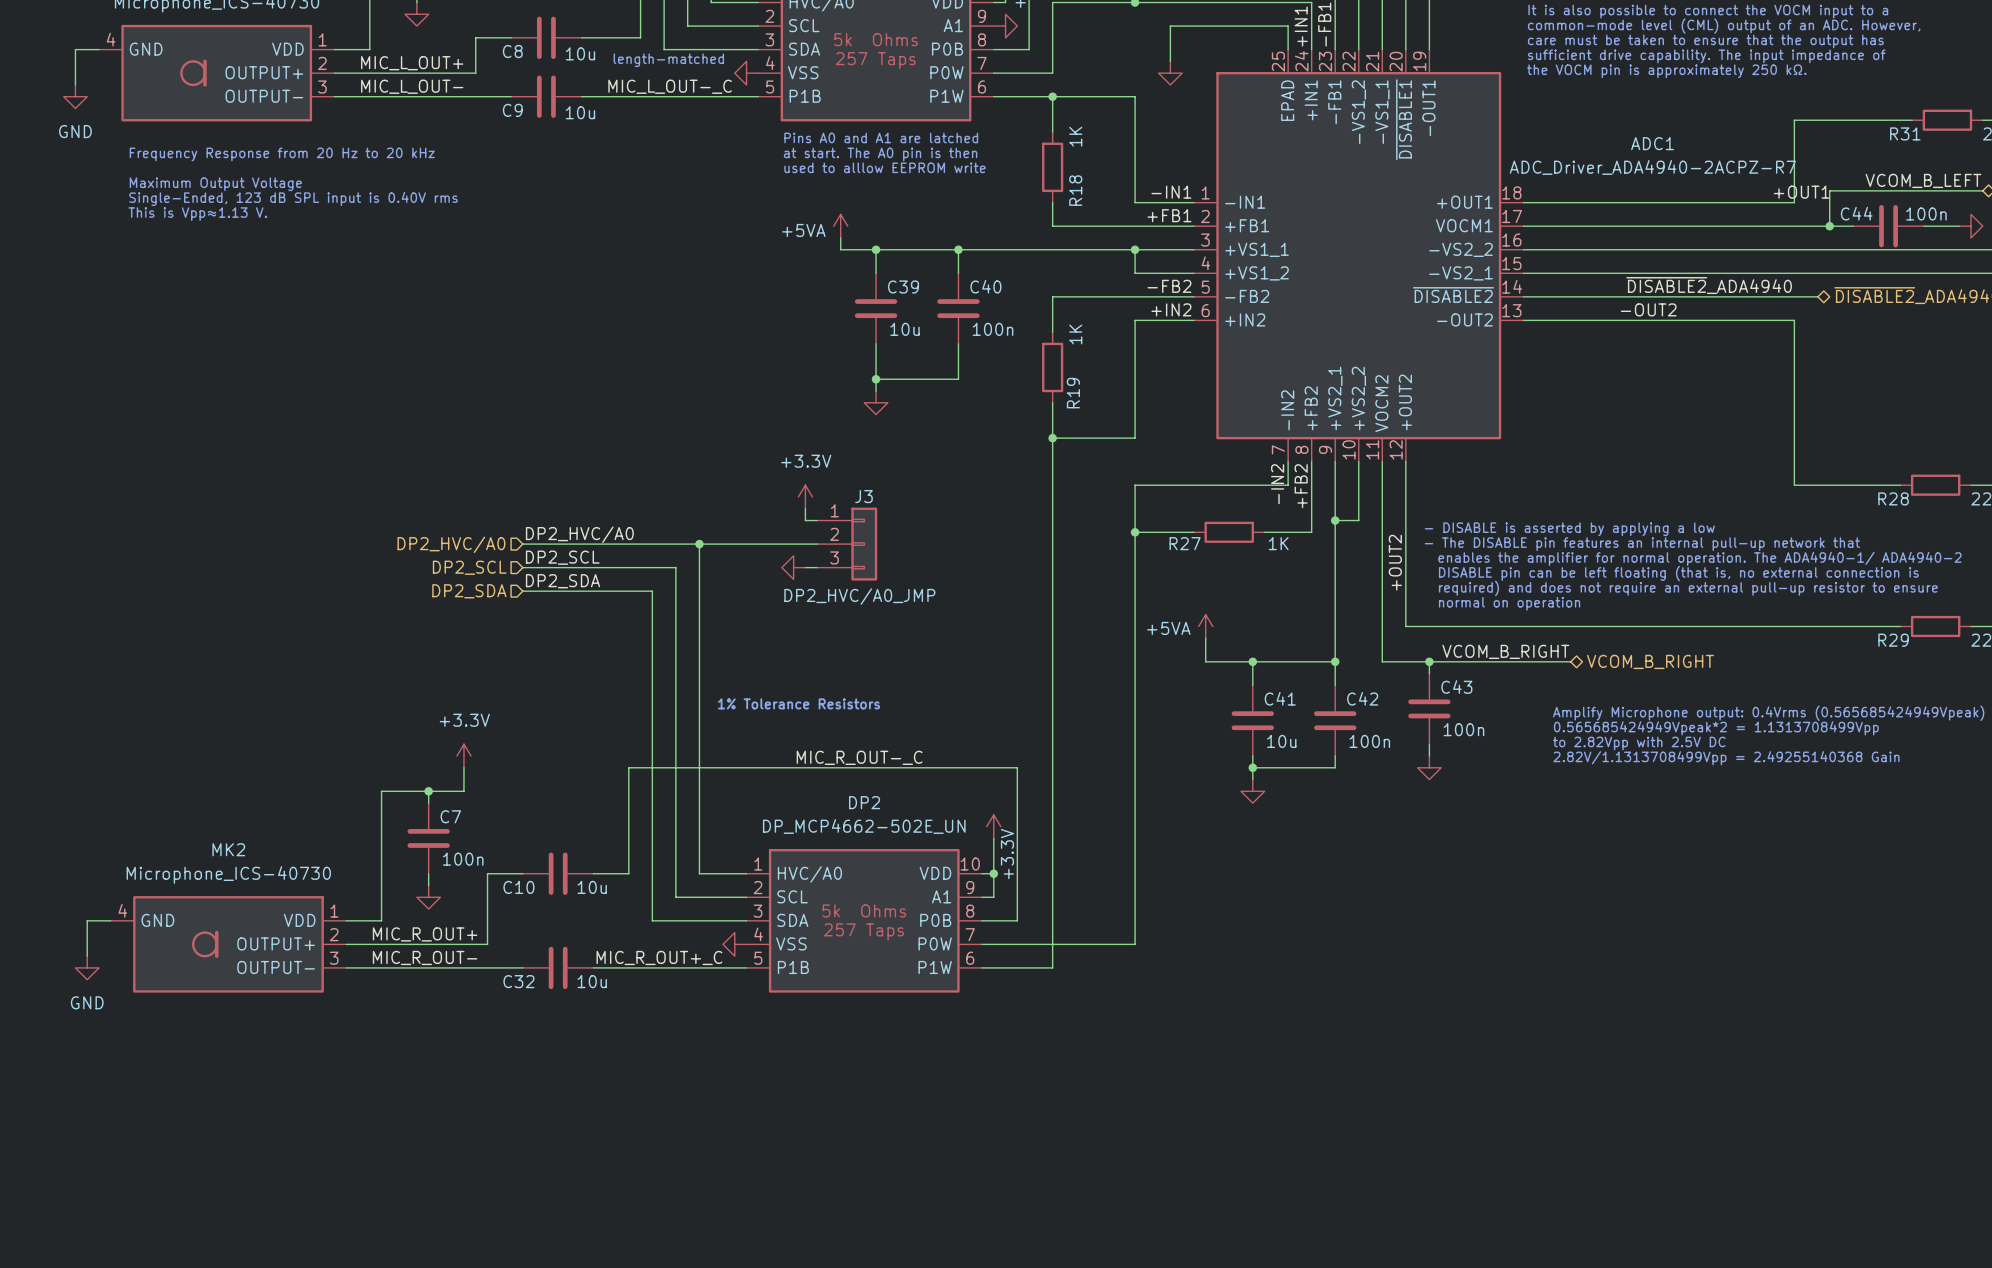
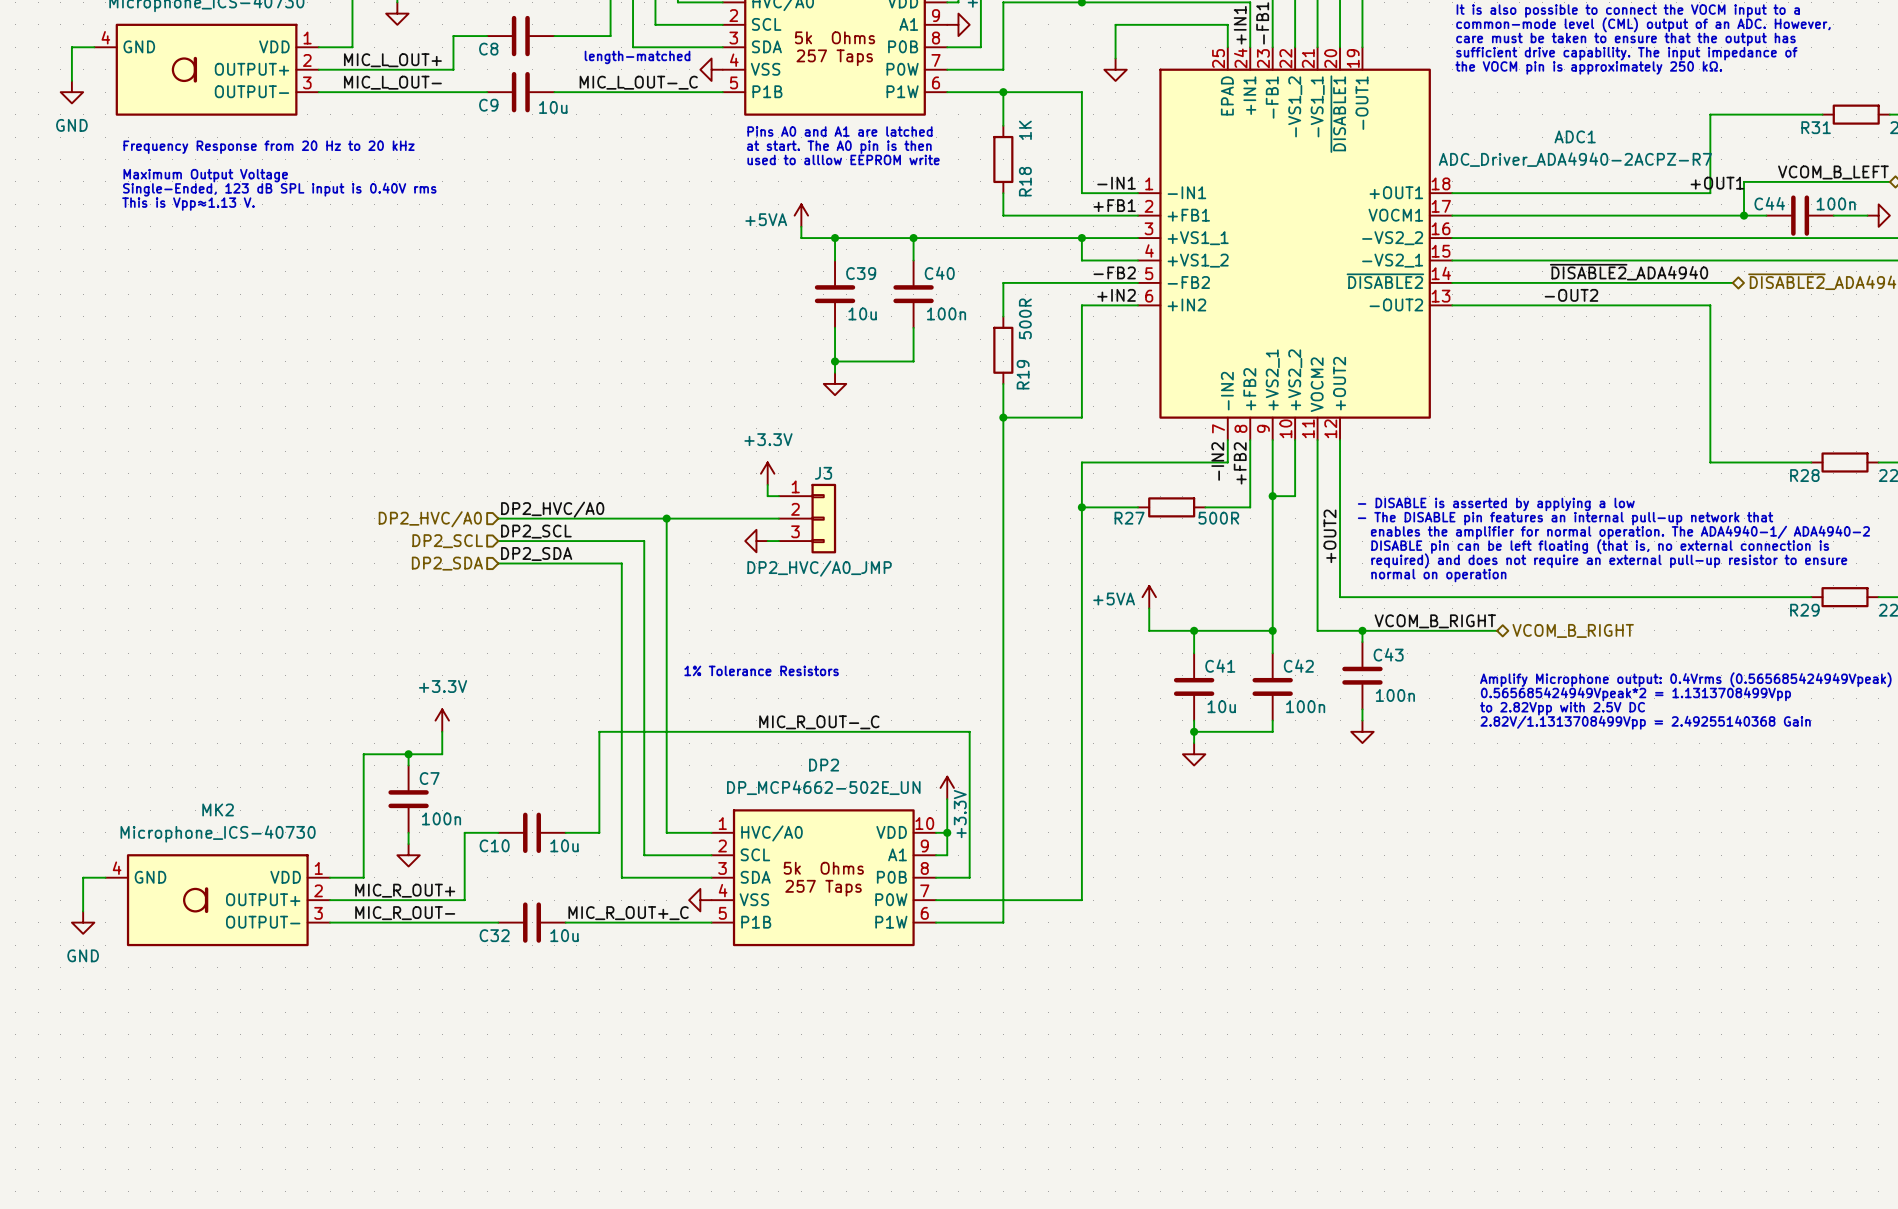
C8 value: 10u (580, 53) -> none
R19 value: 1K (1075, 334) -> 500R (1025, 318)
R27 value: 1K (1278, 543) -> 500R (1218, 518)

